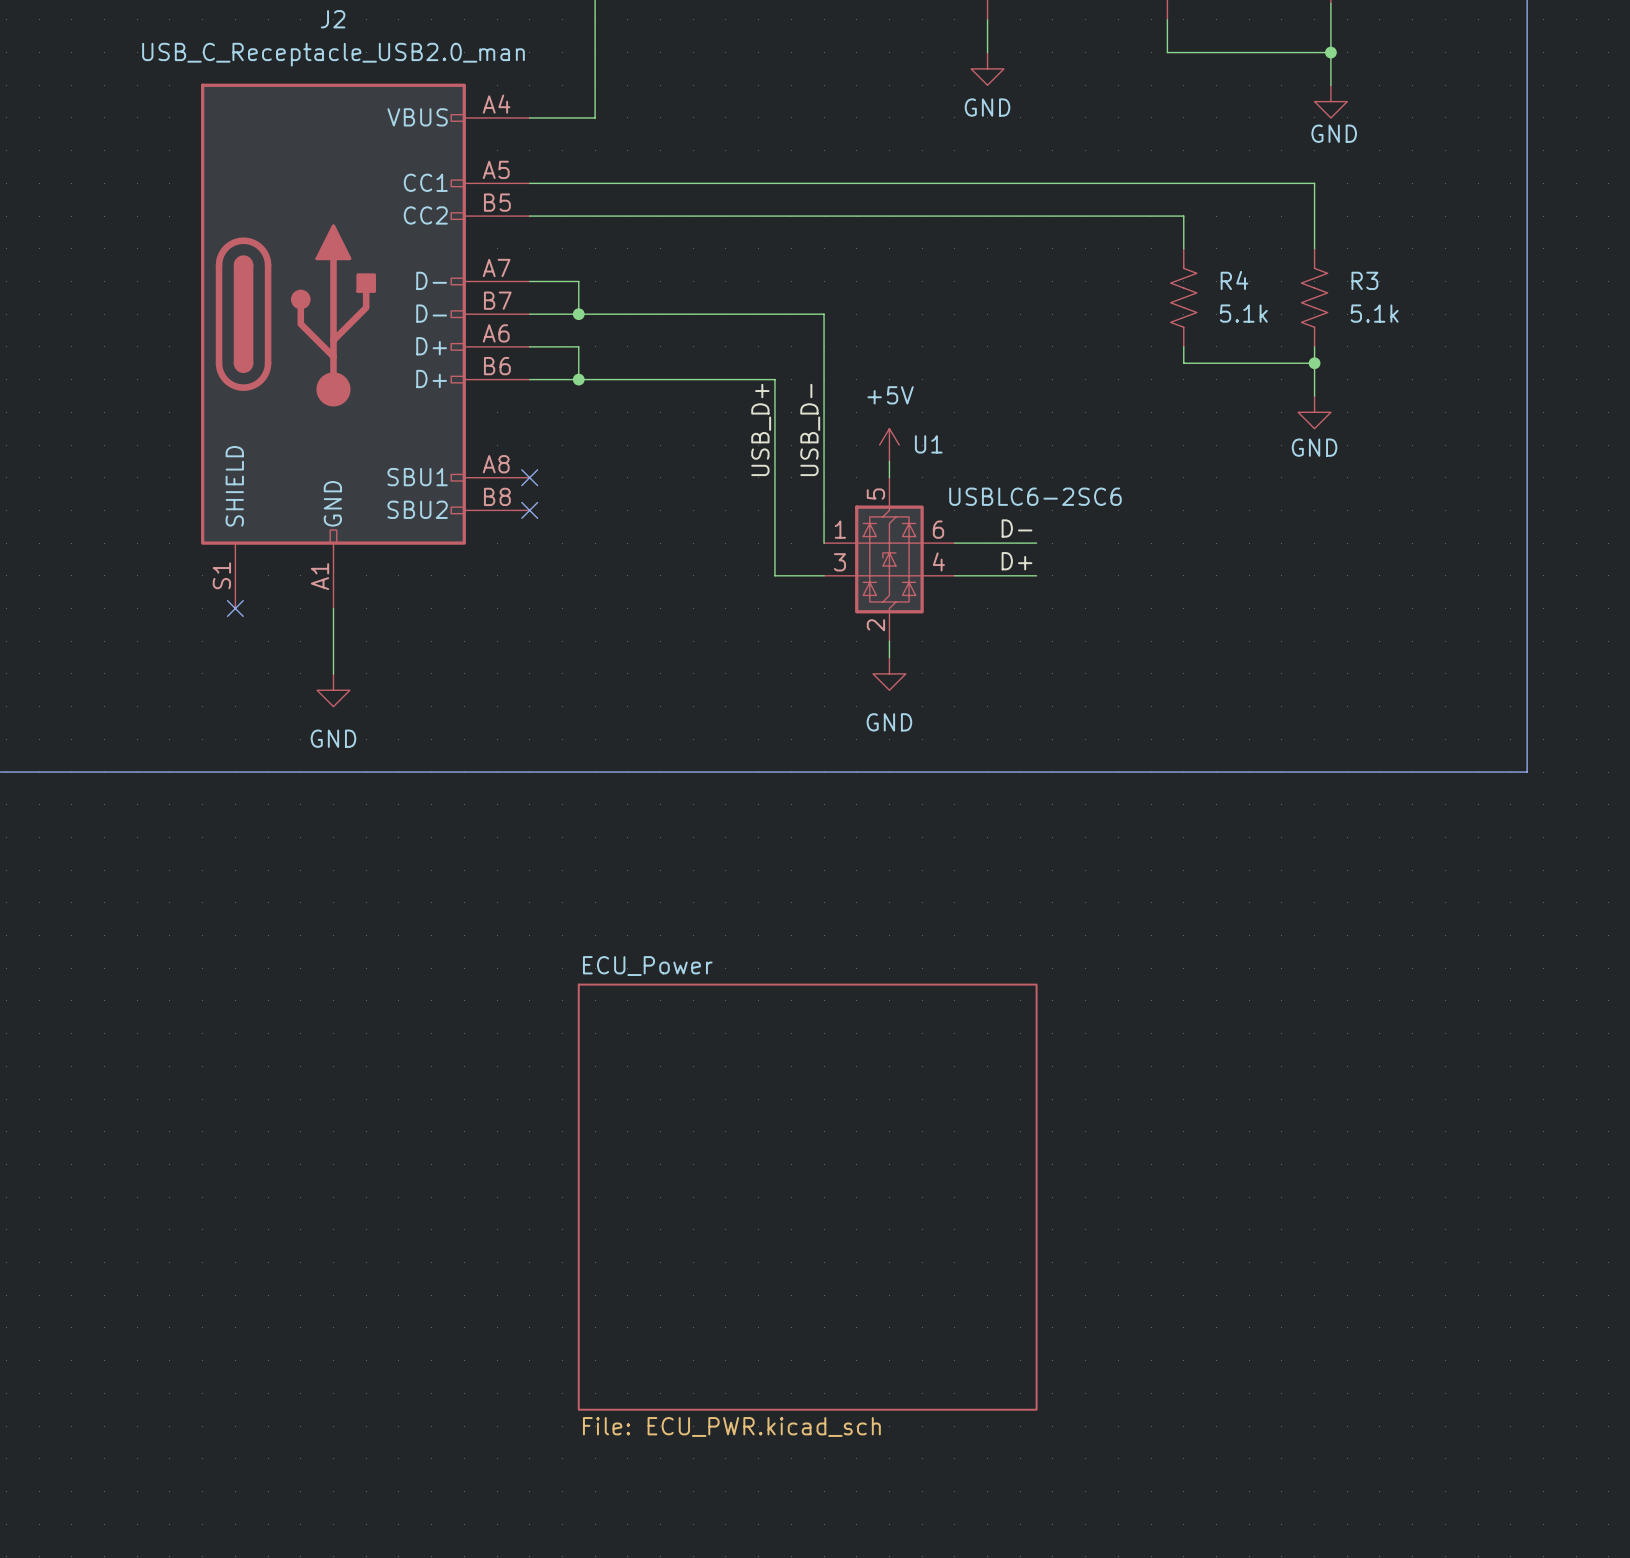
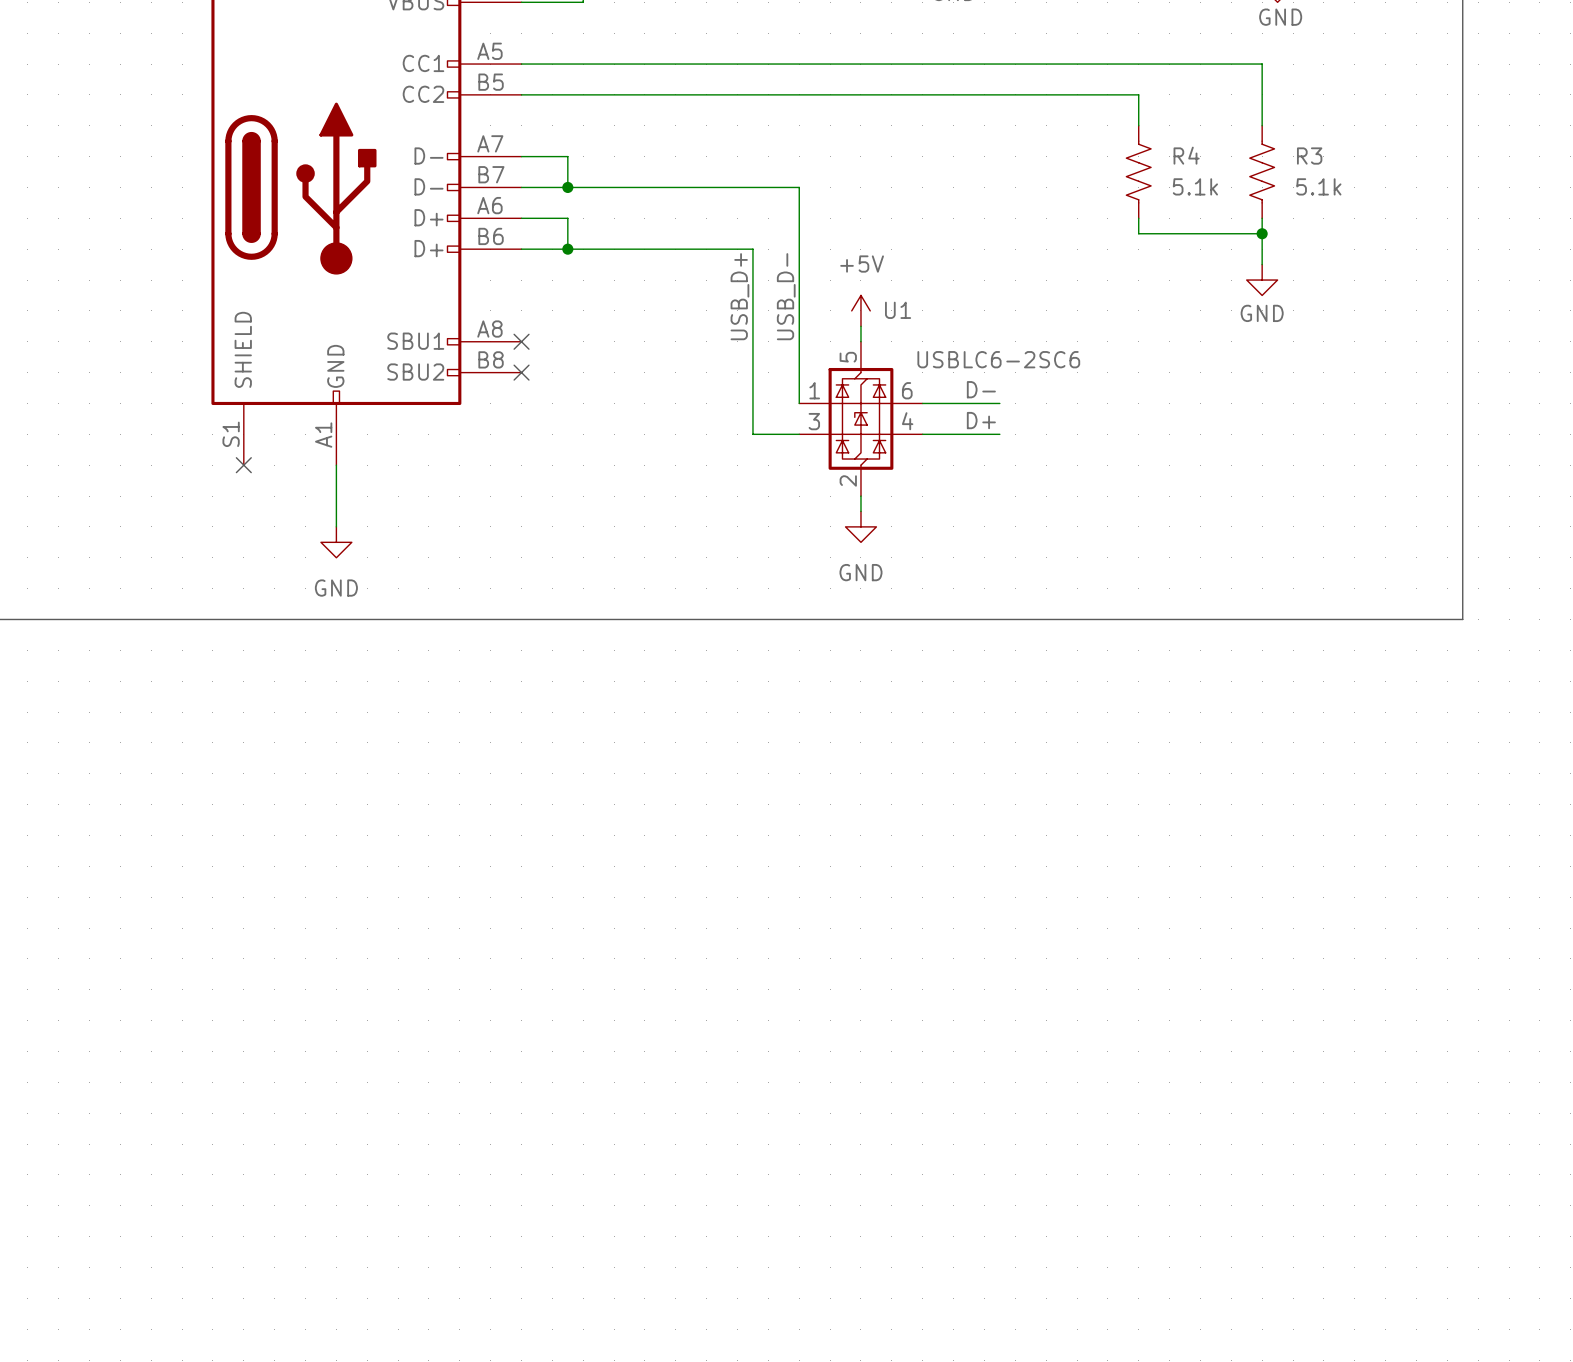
sheet ECU_Power: File: ECU_PWR.kicad_sch (807, 1197) -> none

